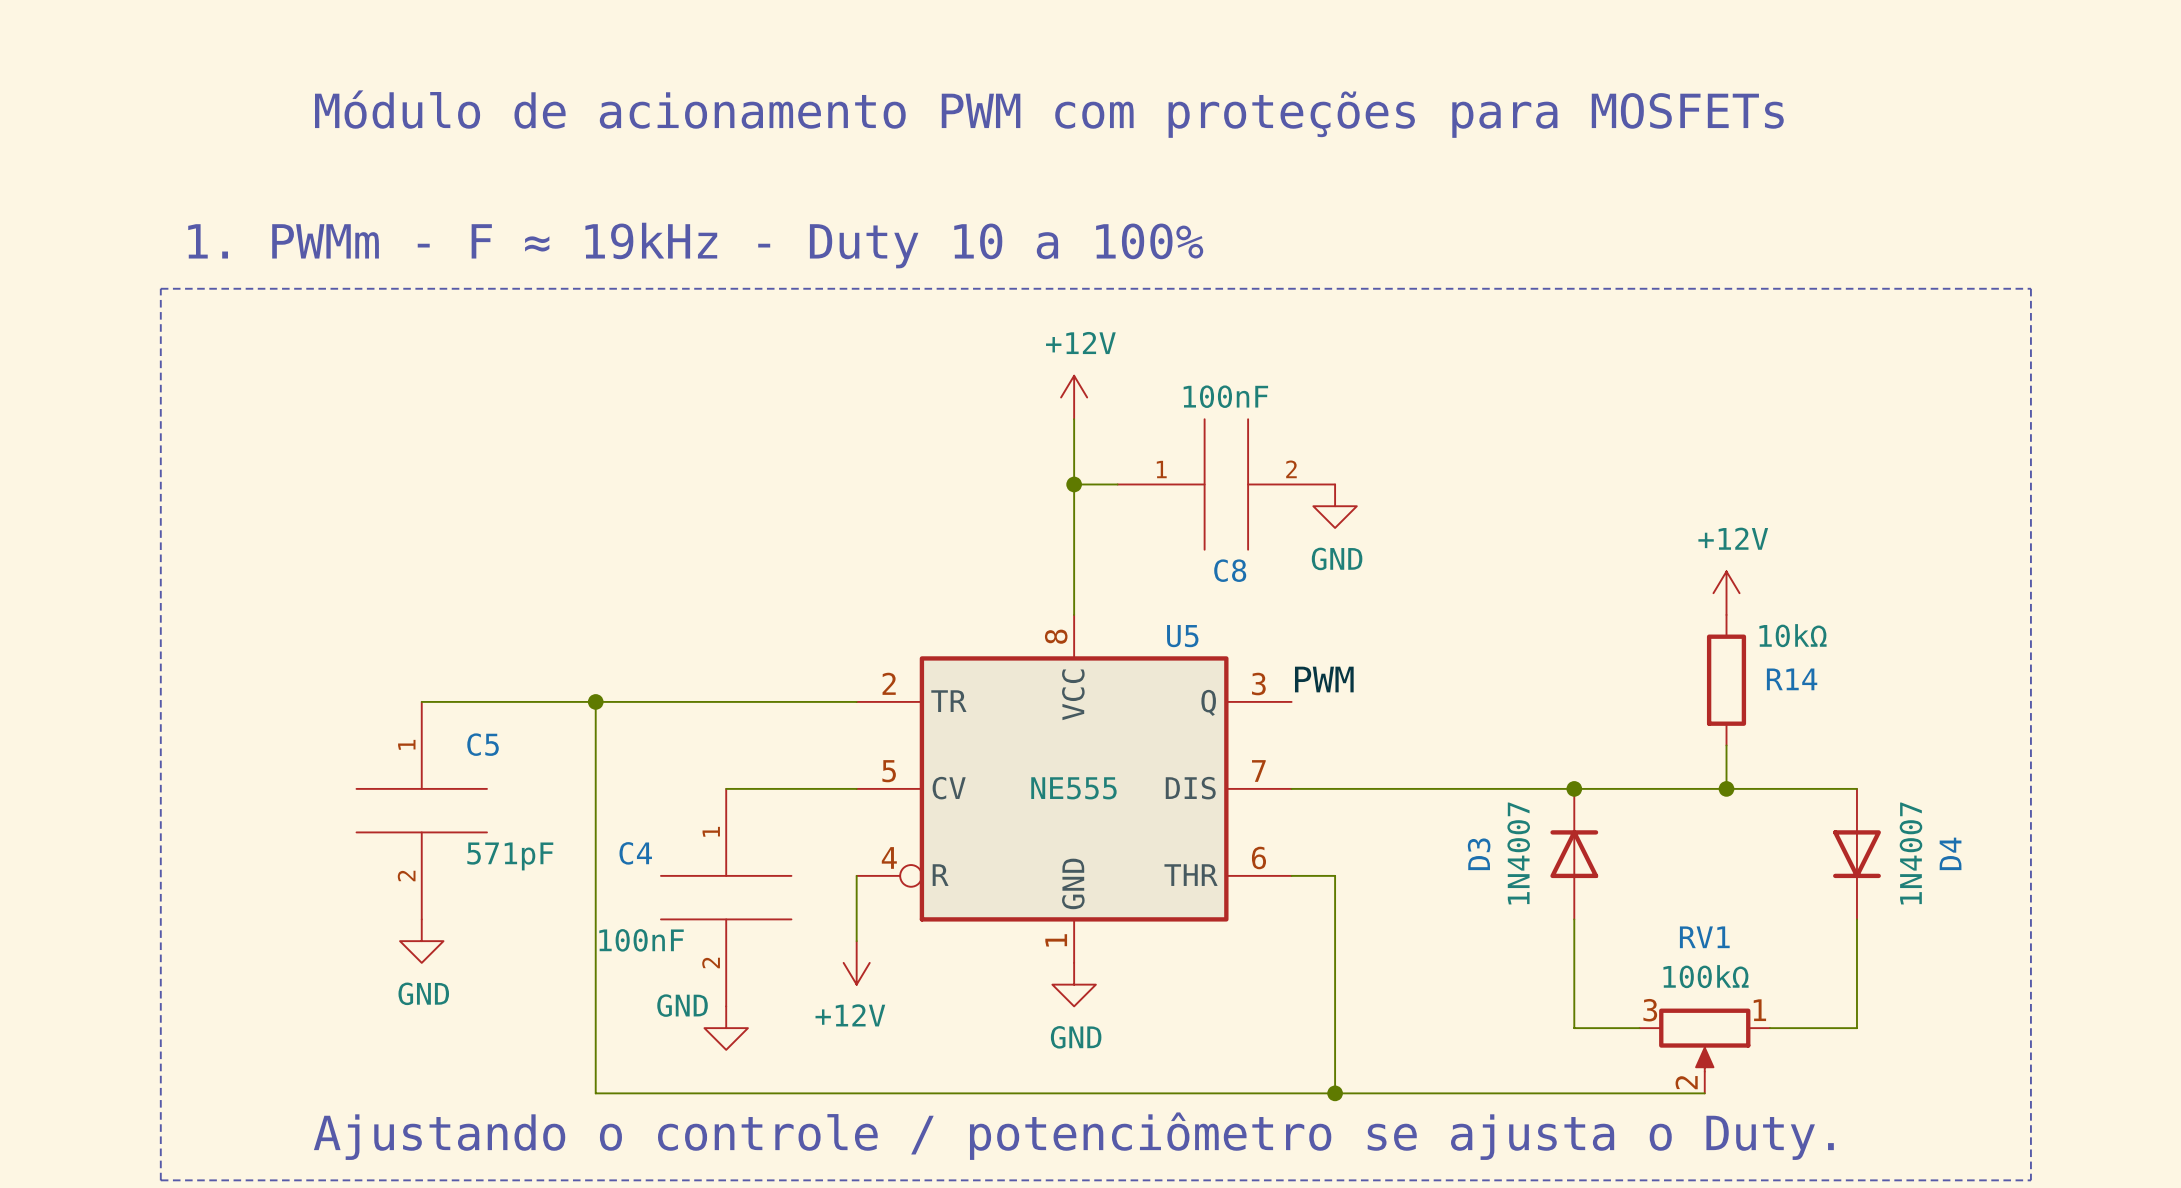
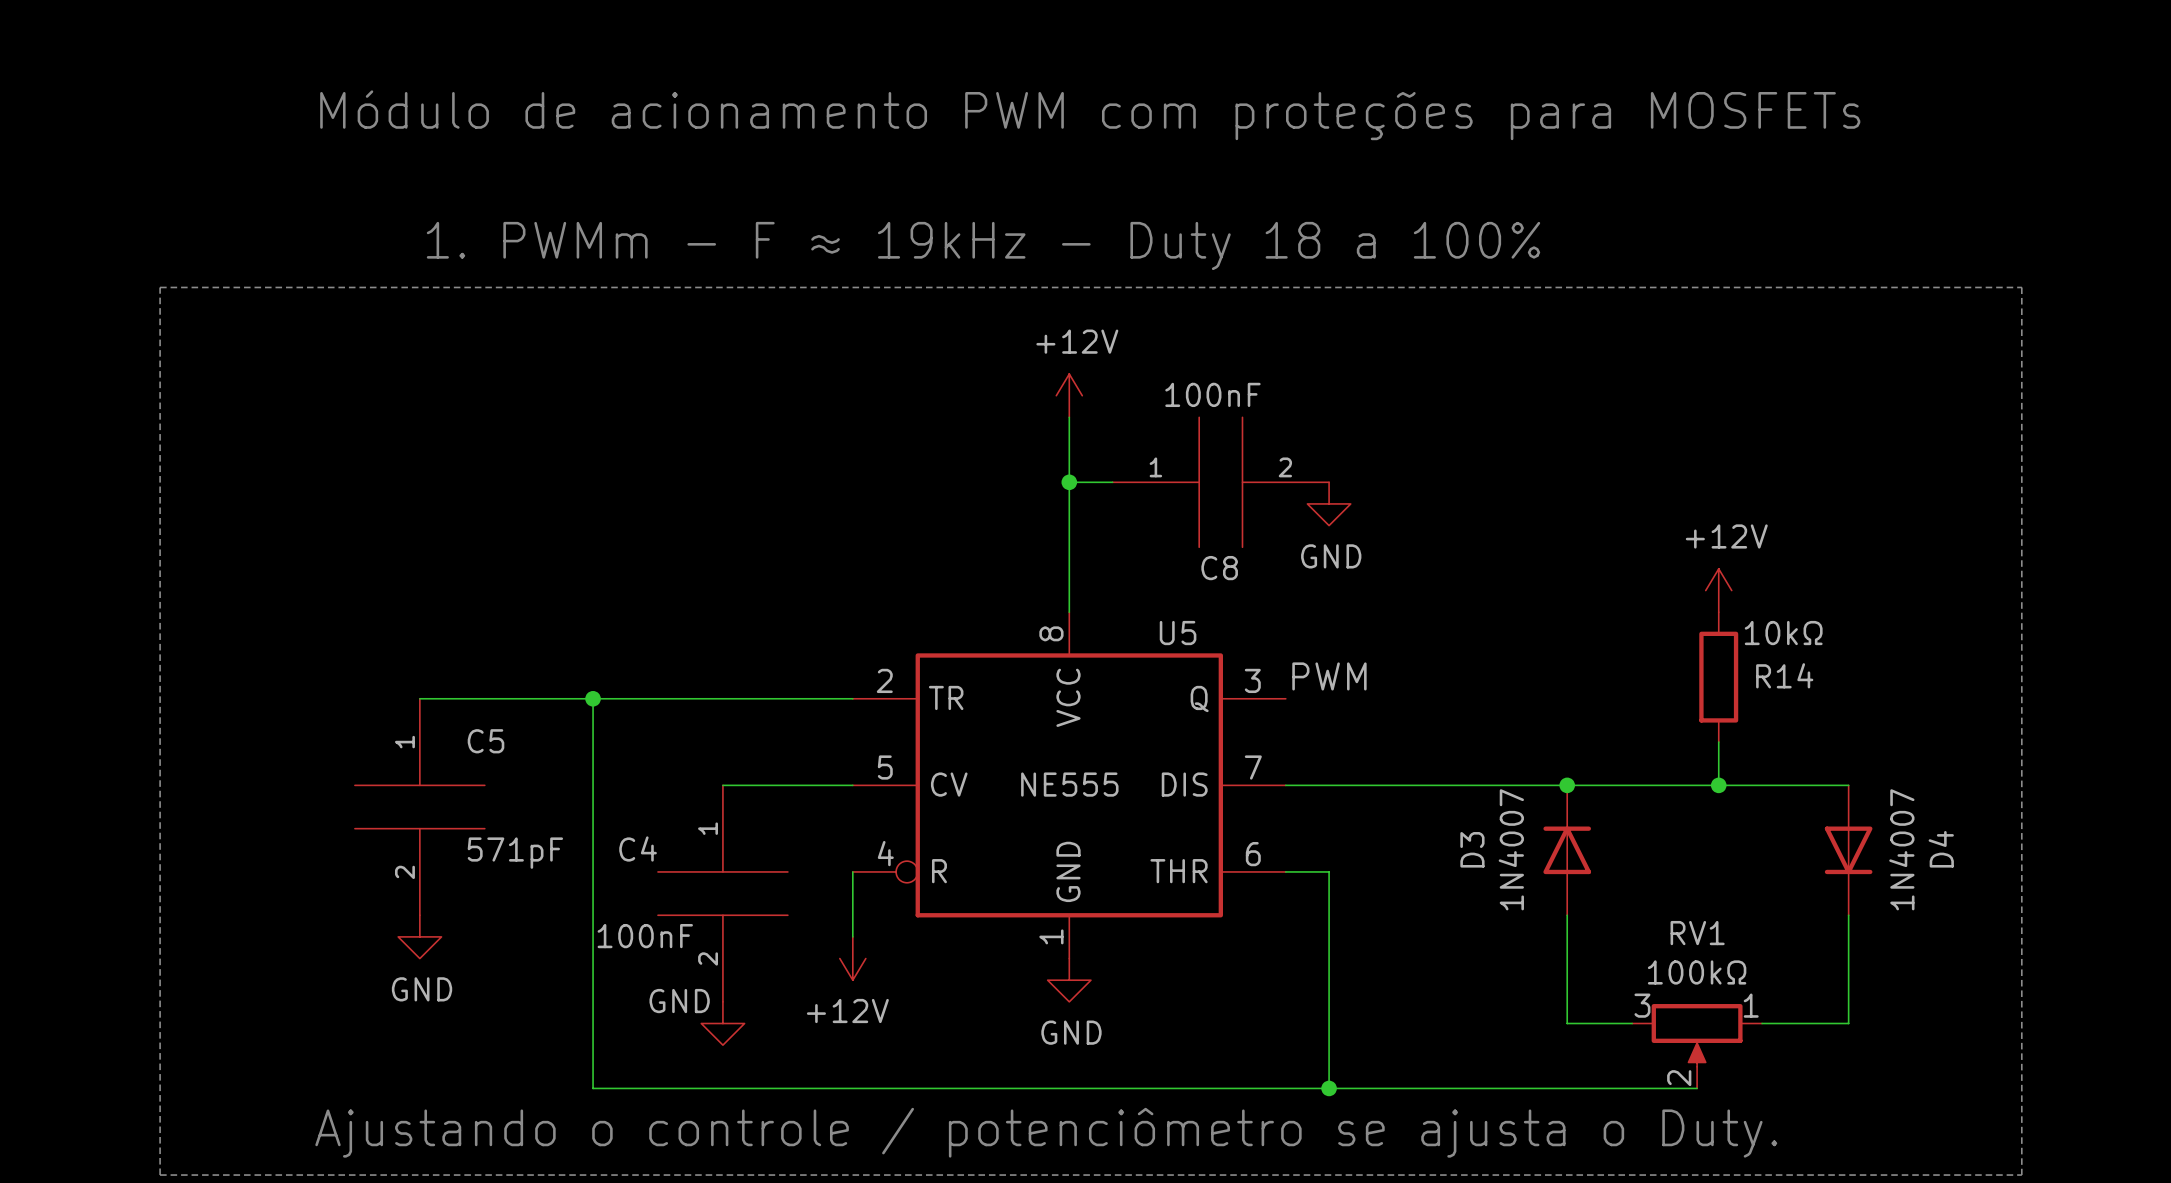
text: 1. PWMm - F ≈ 19kHz - Duty 10 a 100% (695, 245) -> 1. PWMm - F ≈ 19kHz - Duty 18 a 100% (983, 245)

